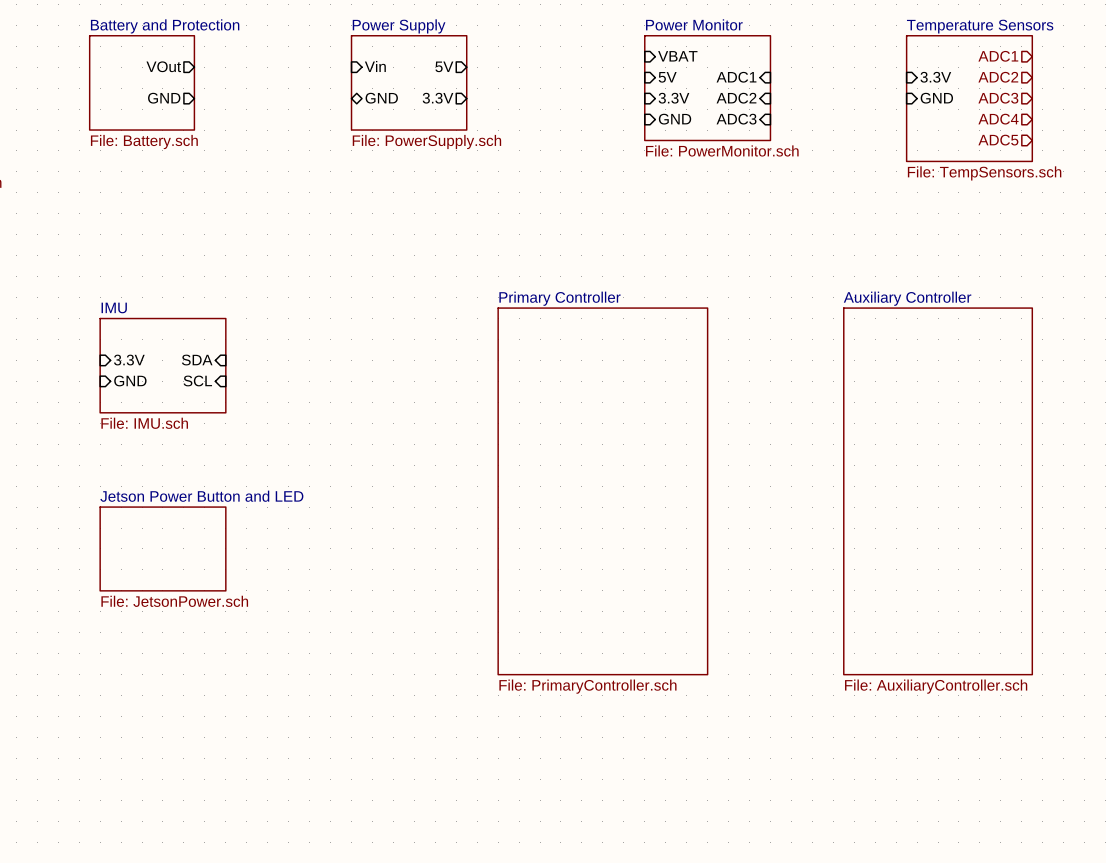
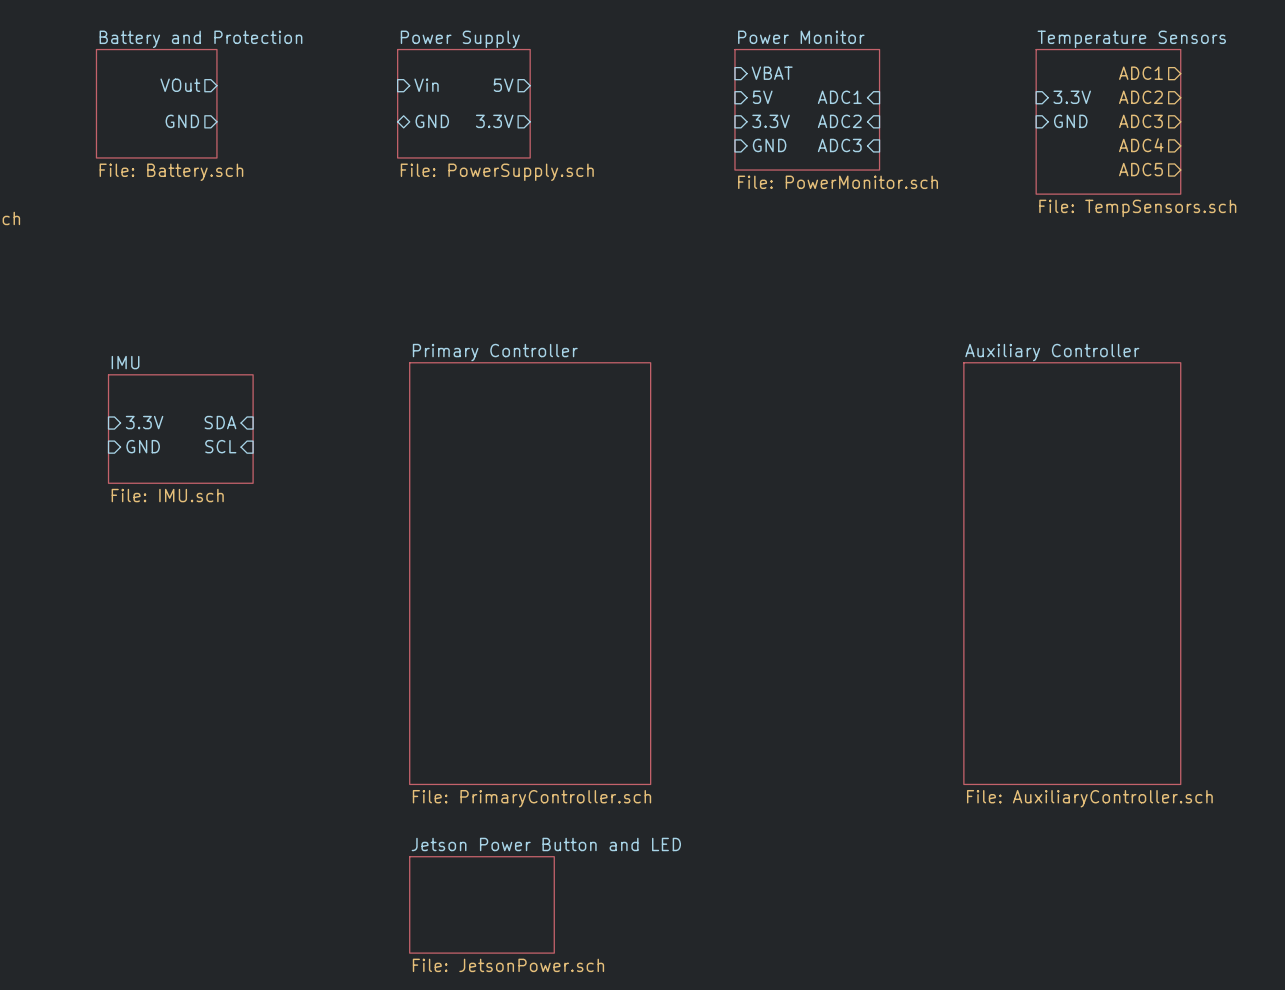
sheet Primary Controller position: (602, 491) -> (530, 573)
sheet Jetson Power Button and LED: File: JetsonPower.sch (162, 548) -> none
sheet Jetson Power Button and LED: none -> File: JetsonPower.sch (481, 904)

